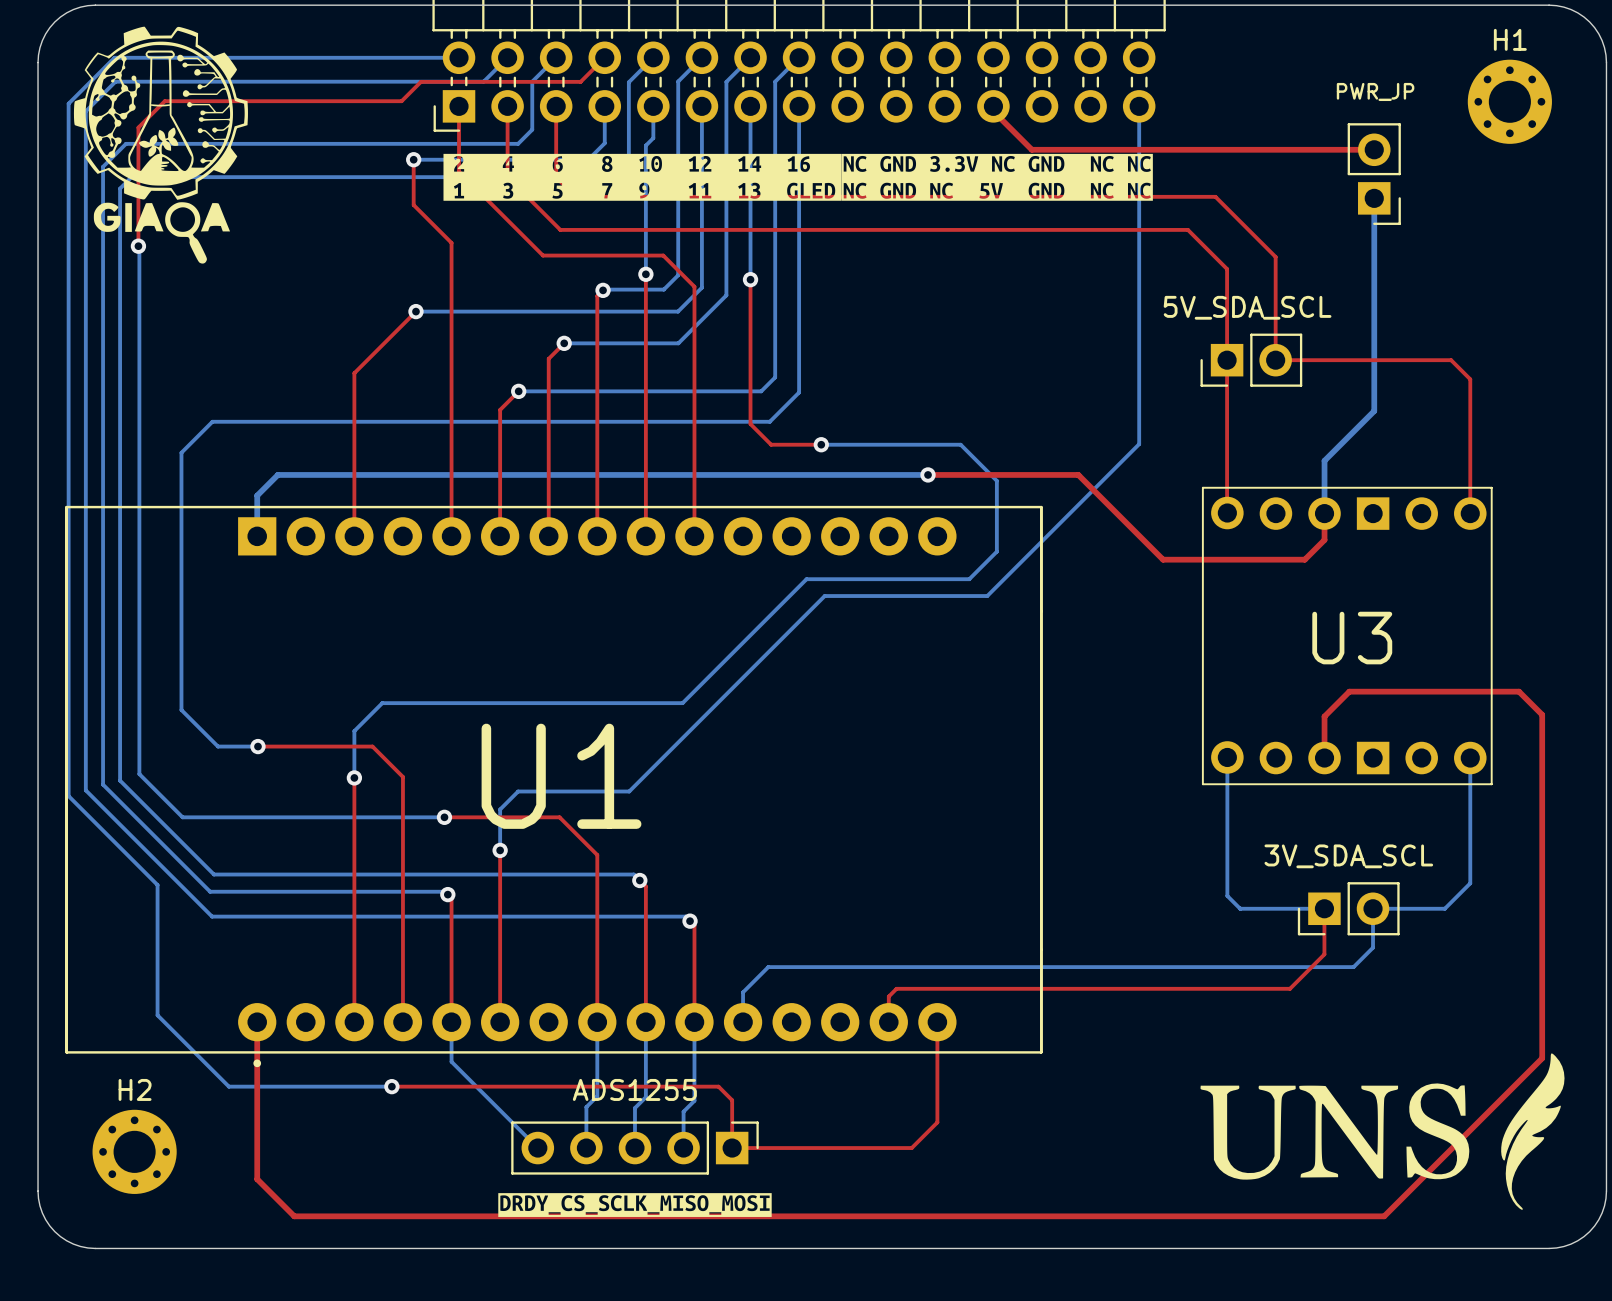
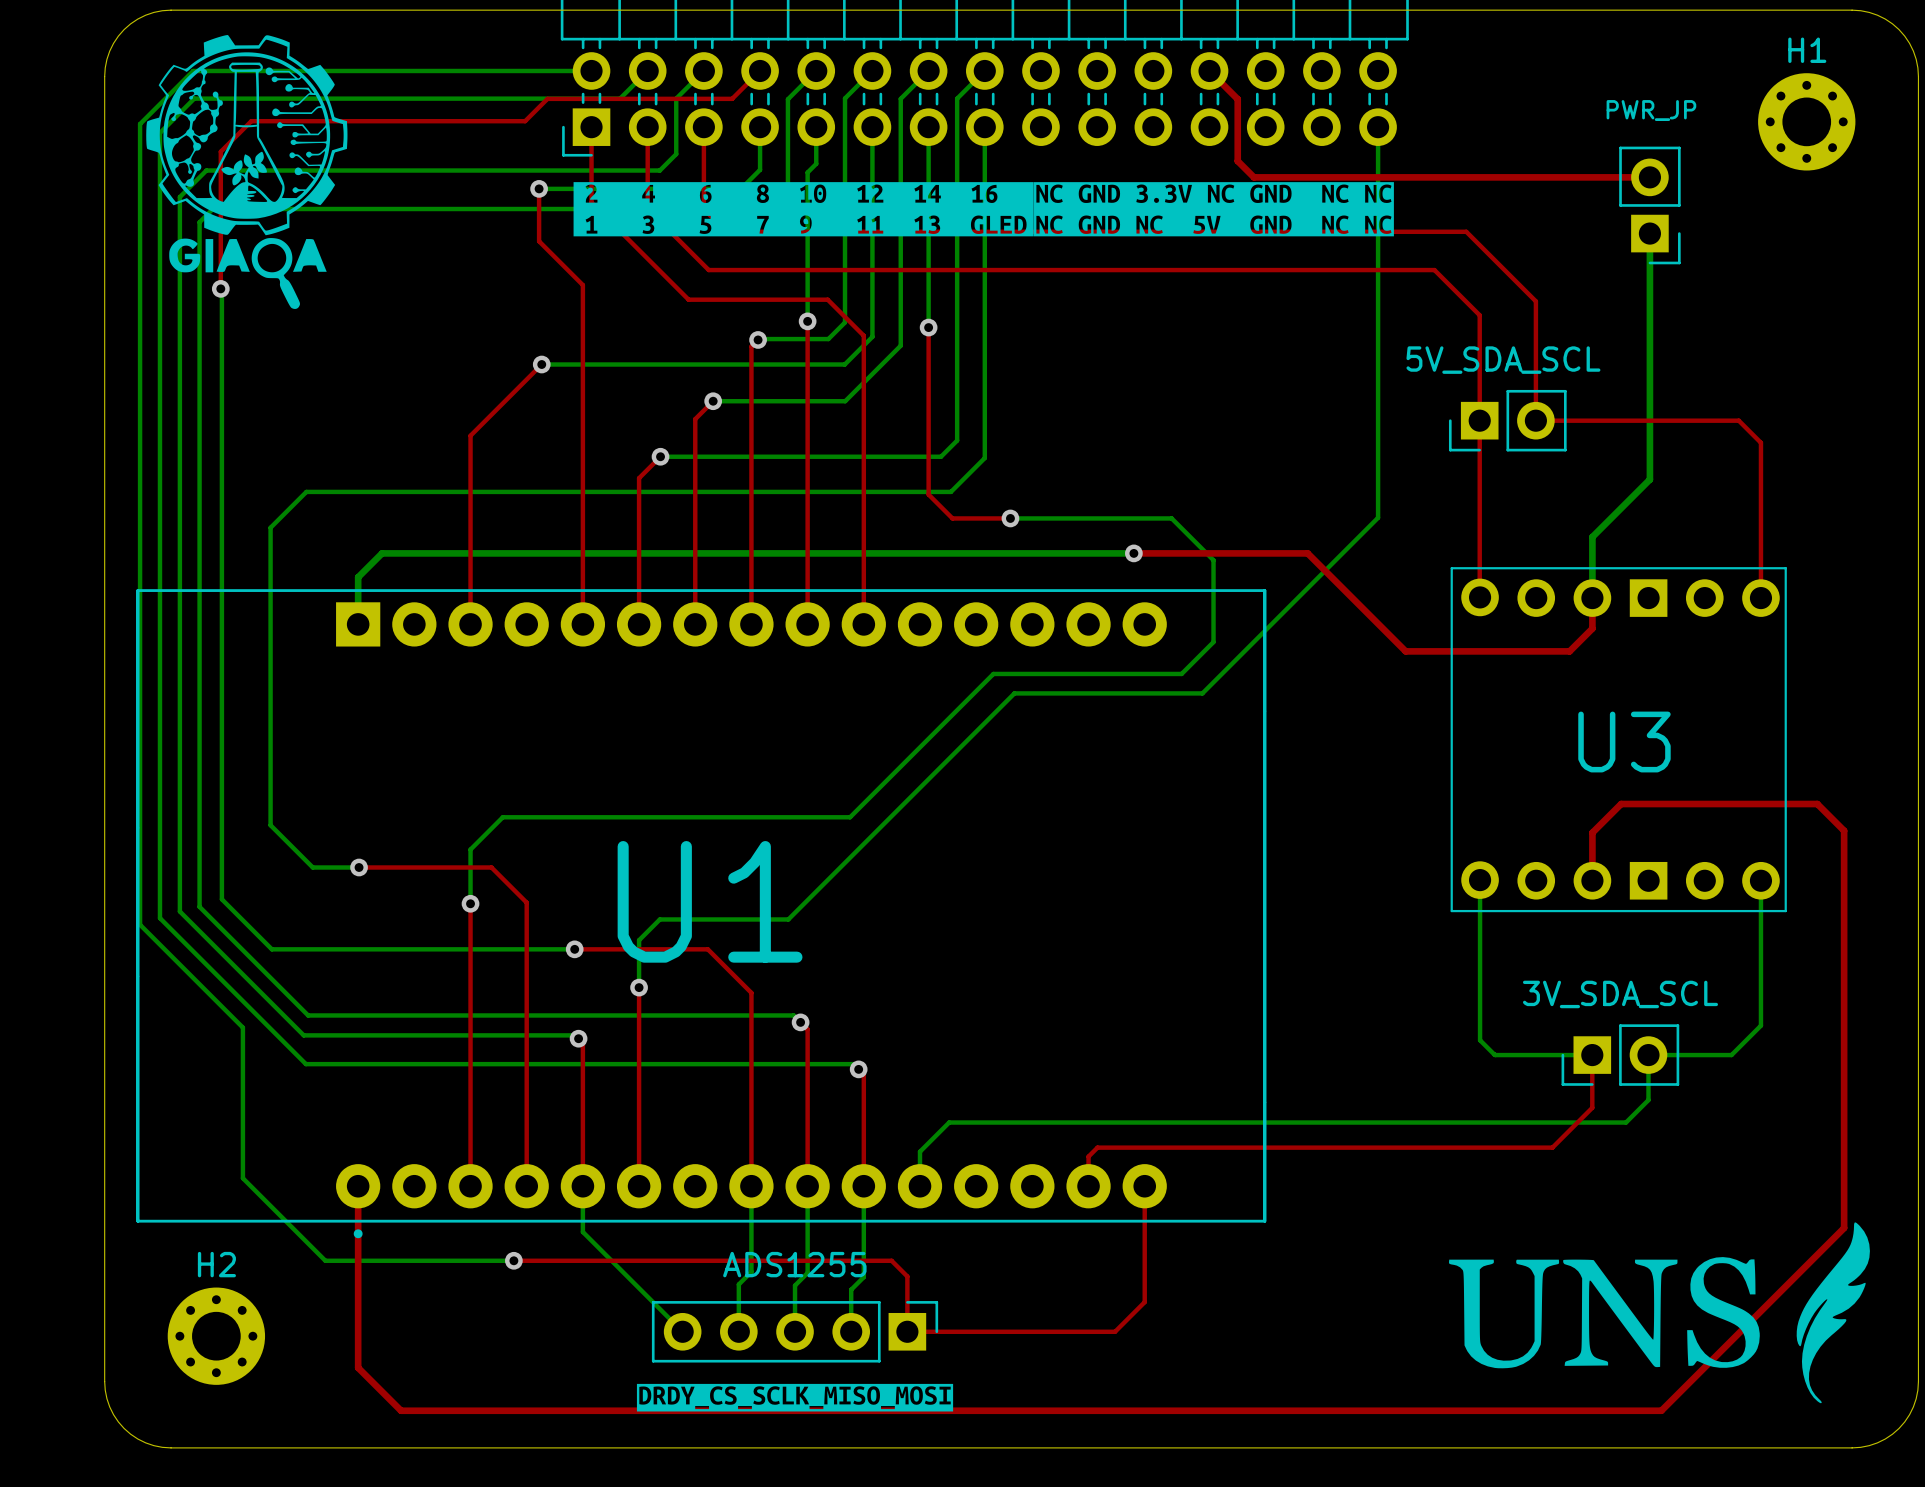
top track: (993, 106) (993, 111) (1017, 135) -> (1209, 70) (1237, 99) (1237, 161)

